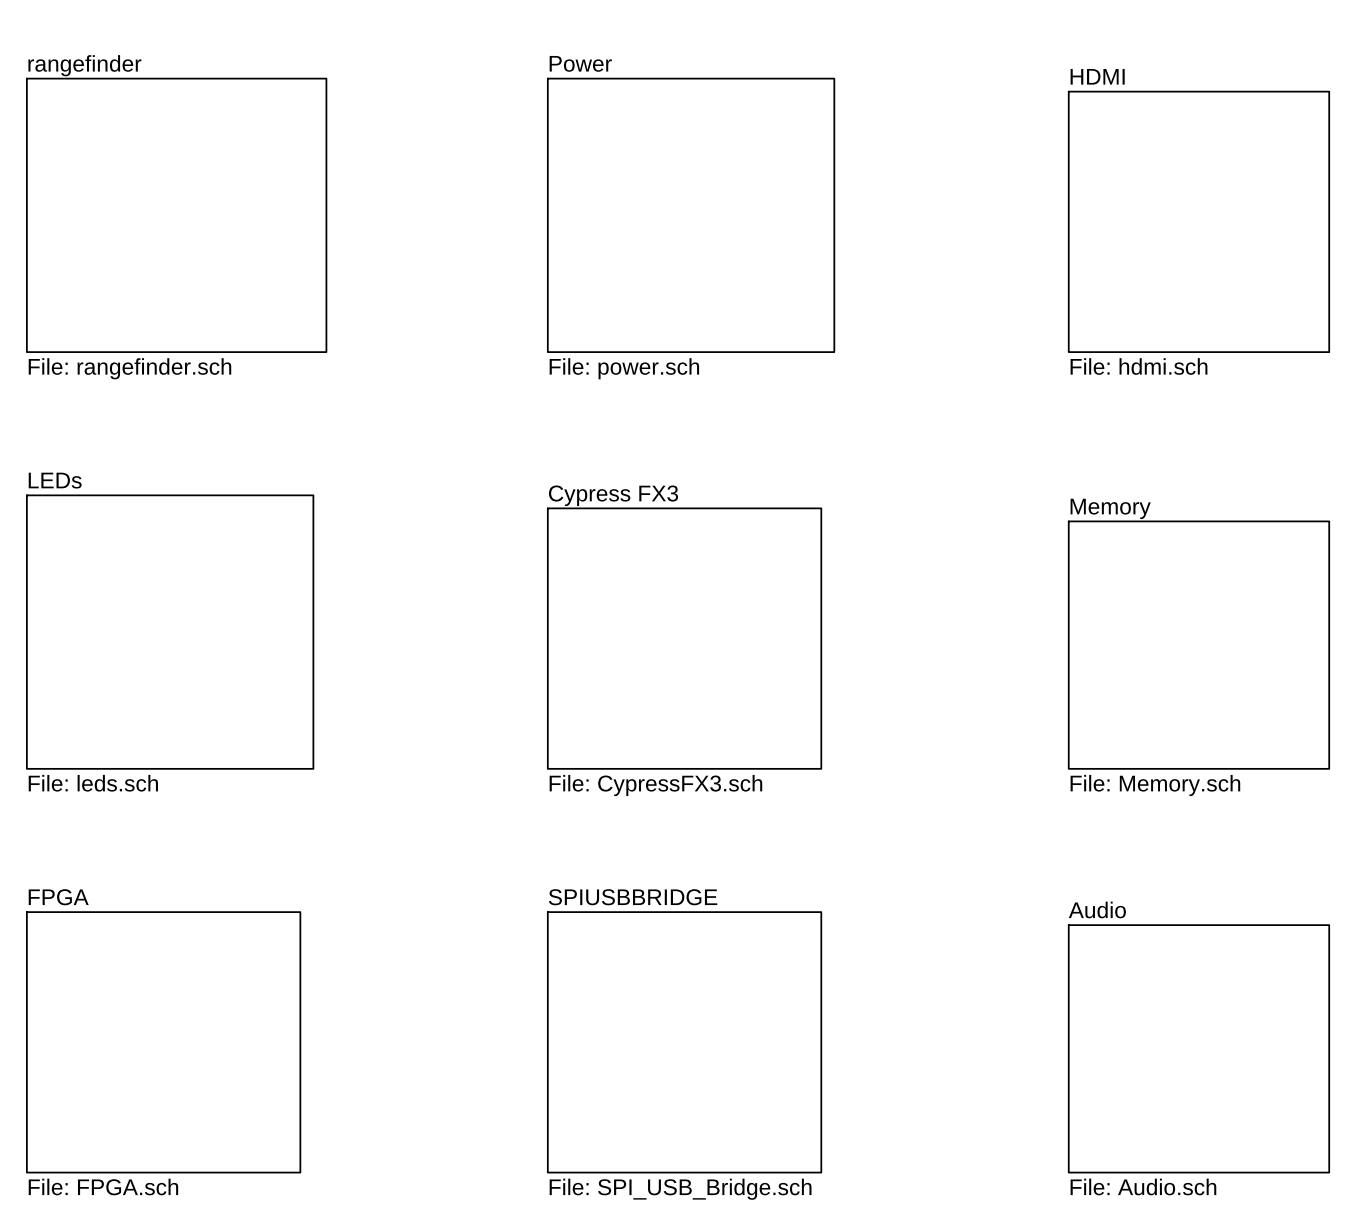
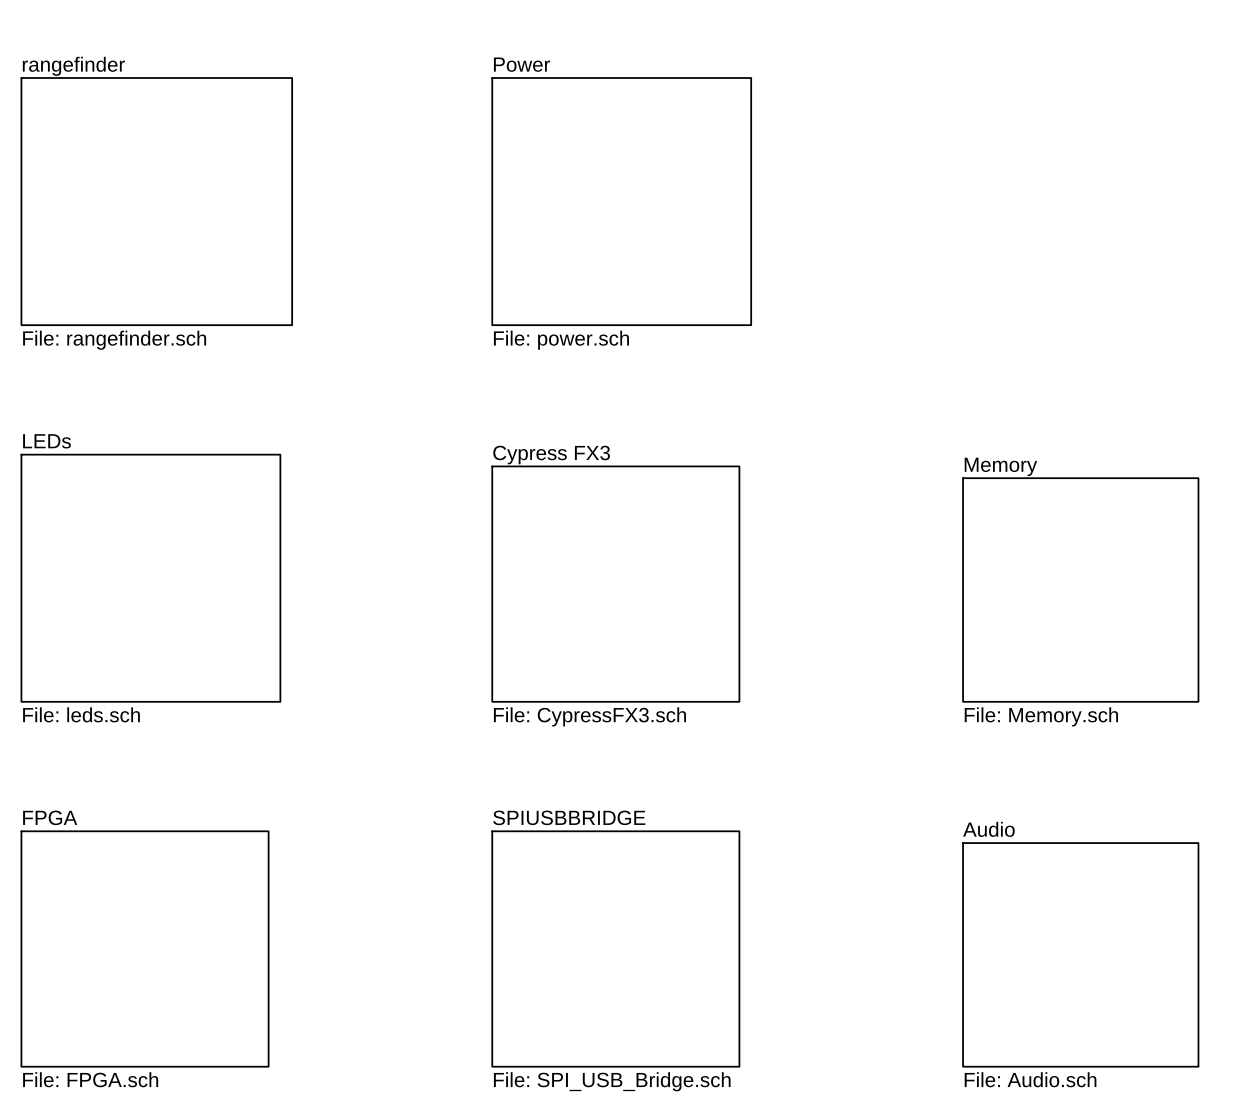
sheet HDMI: File: hdmi.sch (1198, 221) -> none

